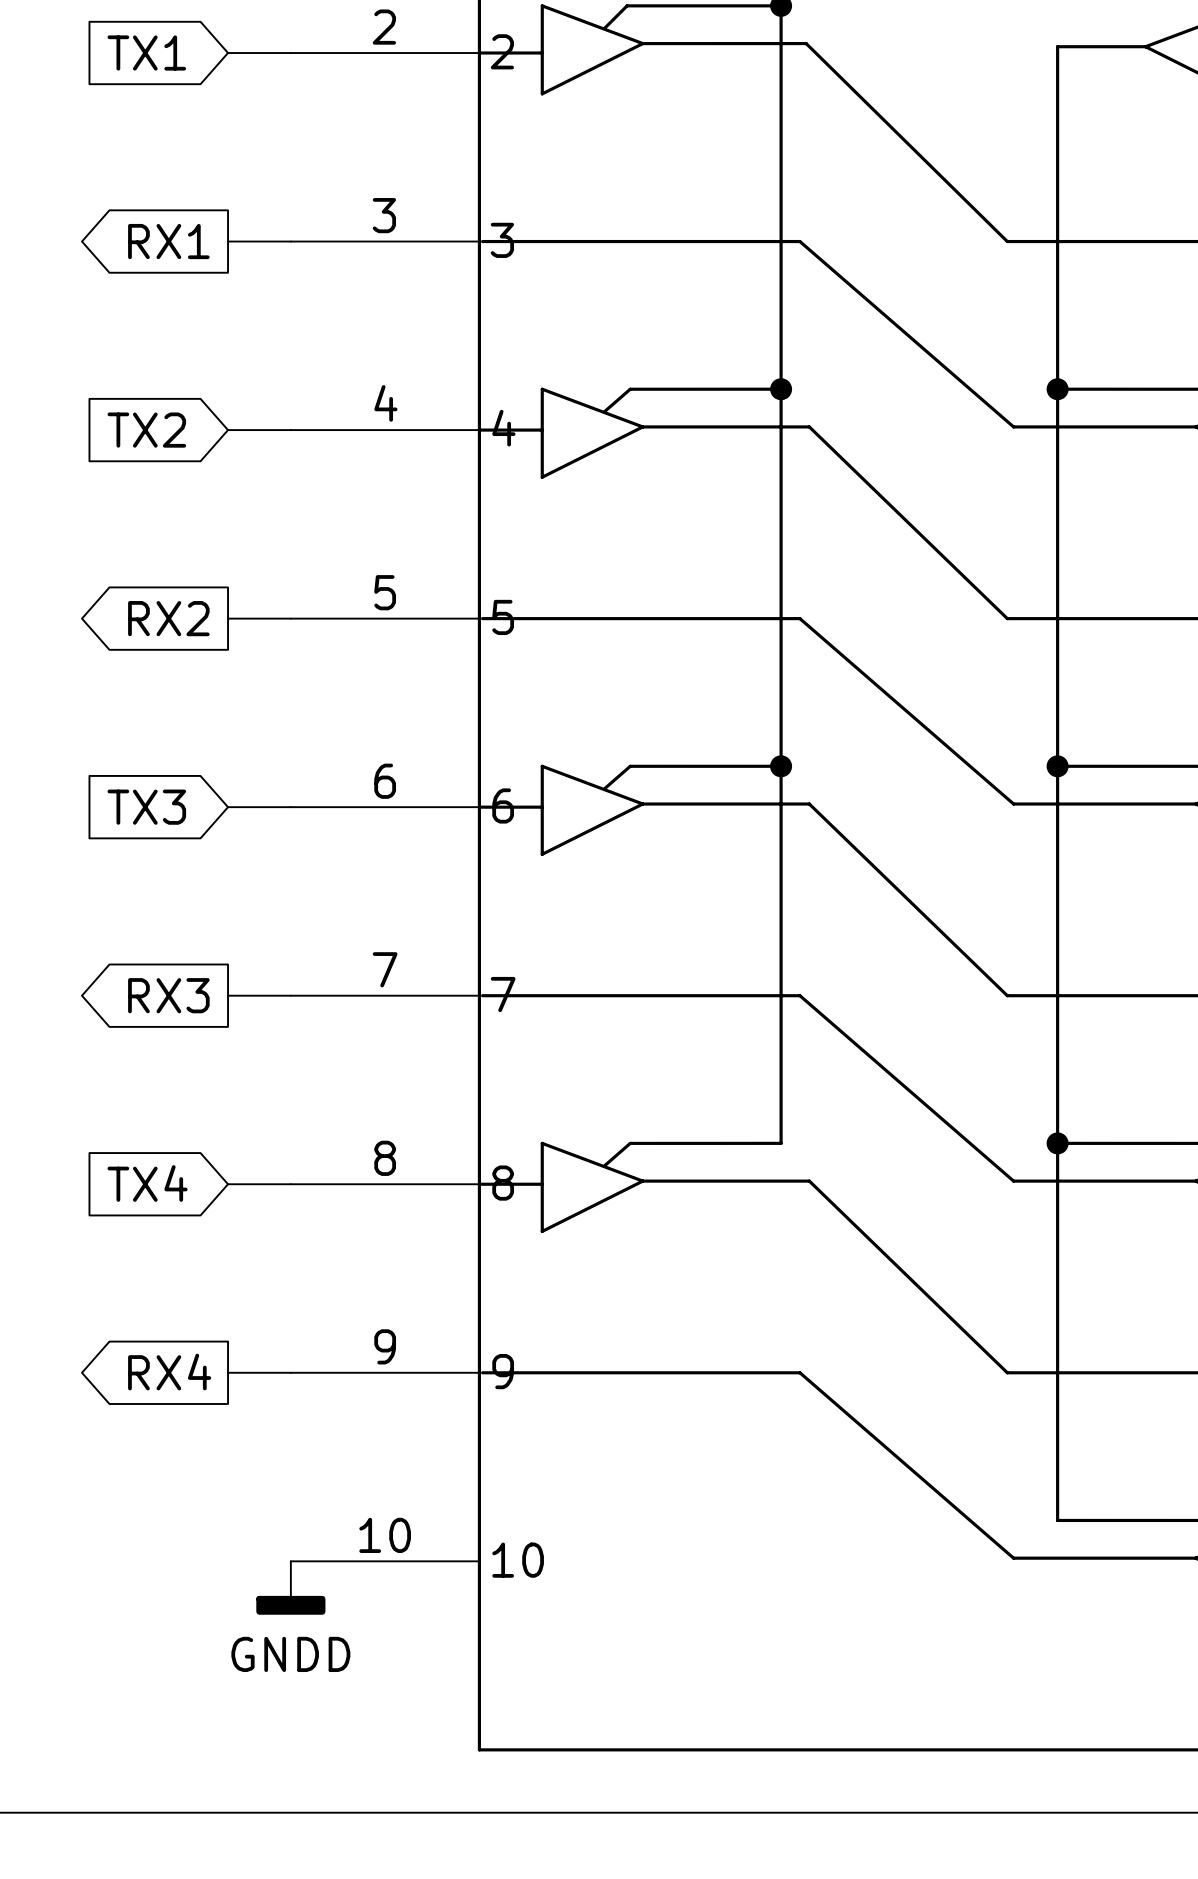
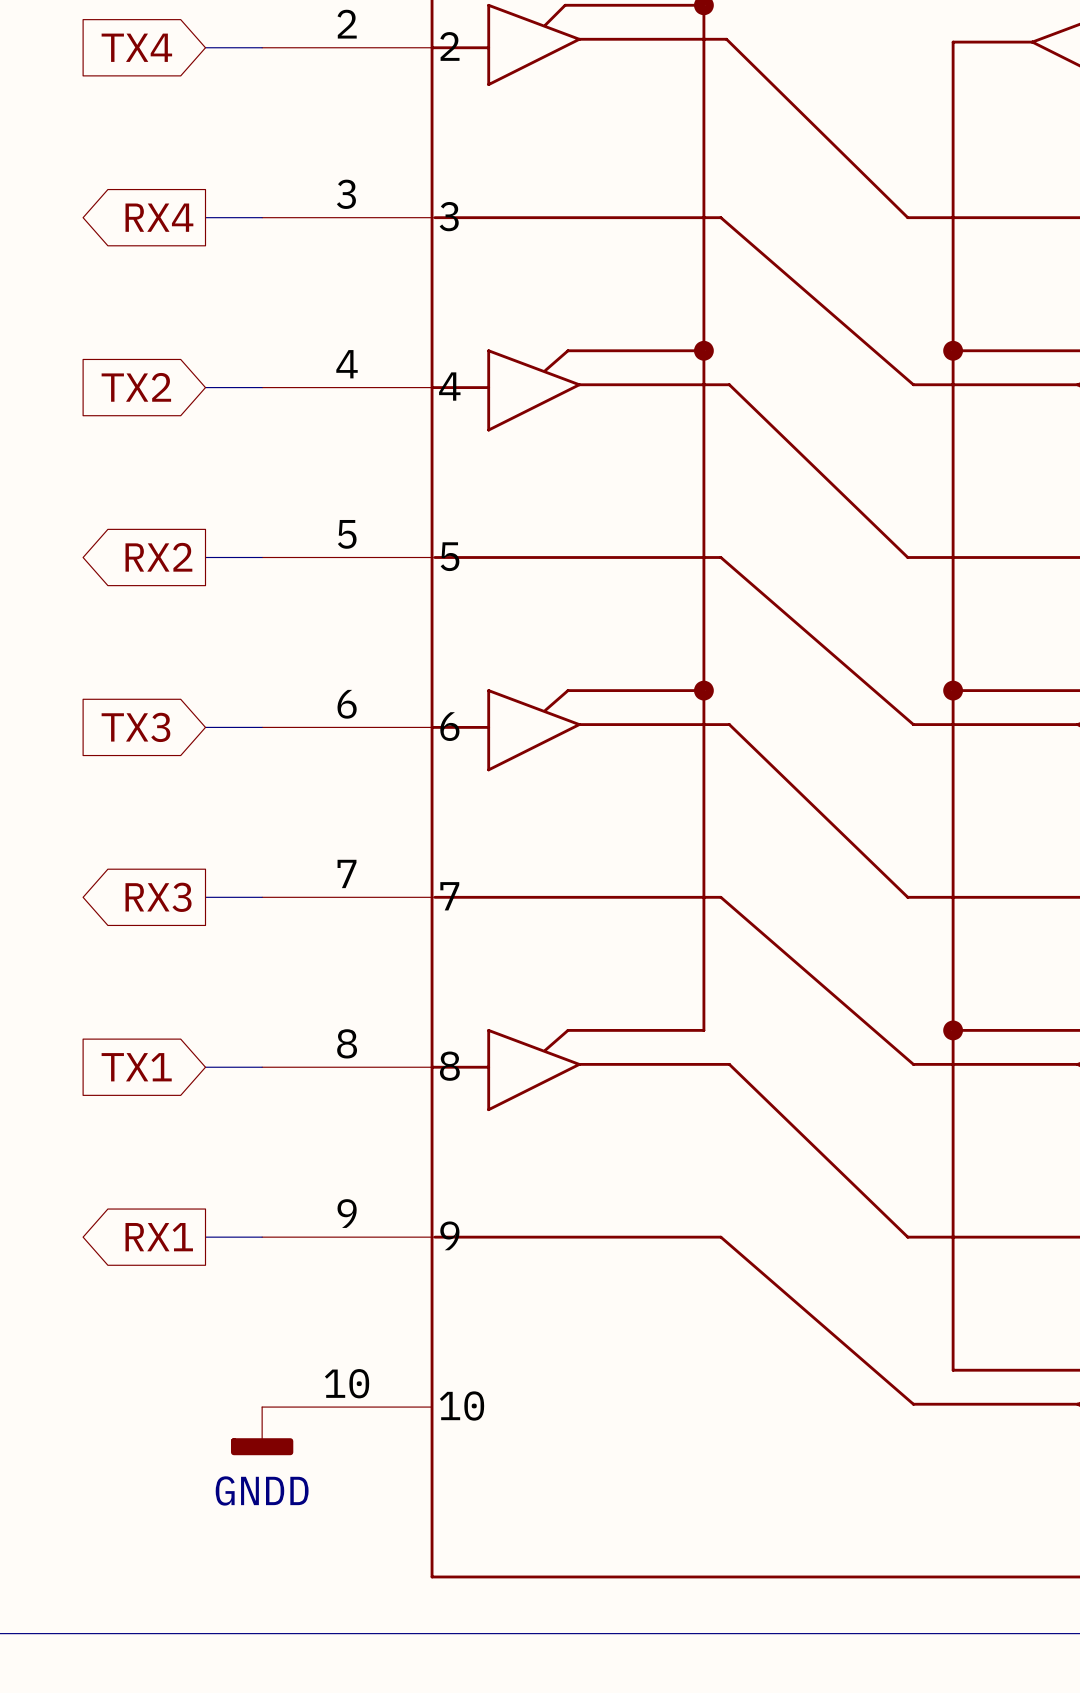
global label: TX1 (146, 52) -> TX4 (136, 47)
global label: RX1 (168, 241) -> RX4 (159, 217)
global label: TX4 (147, 1183) -> TX1 (136, 1067)
global label: RX4 (169, 1372) -> RX1 (159, 1237)

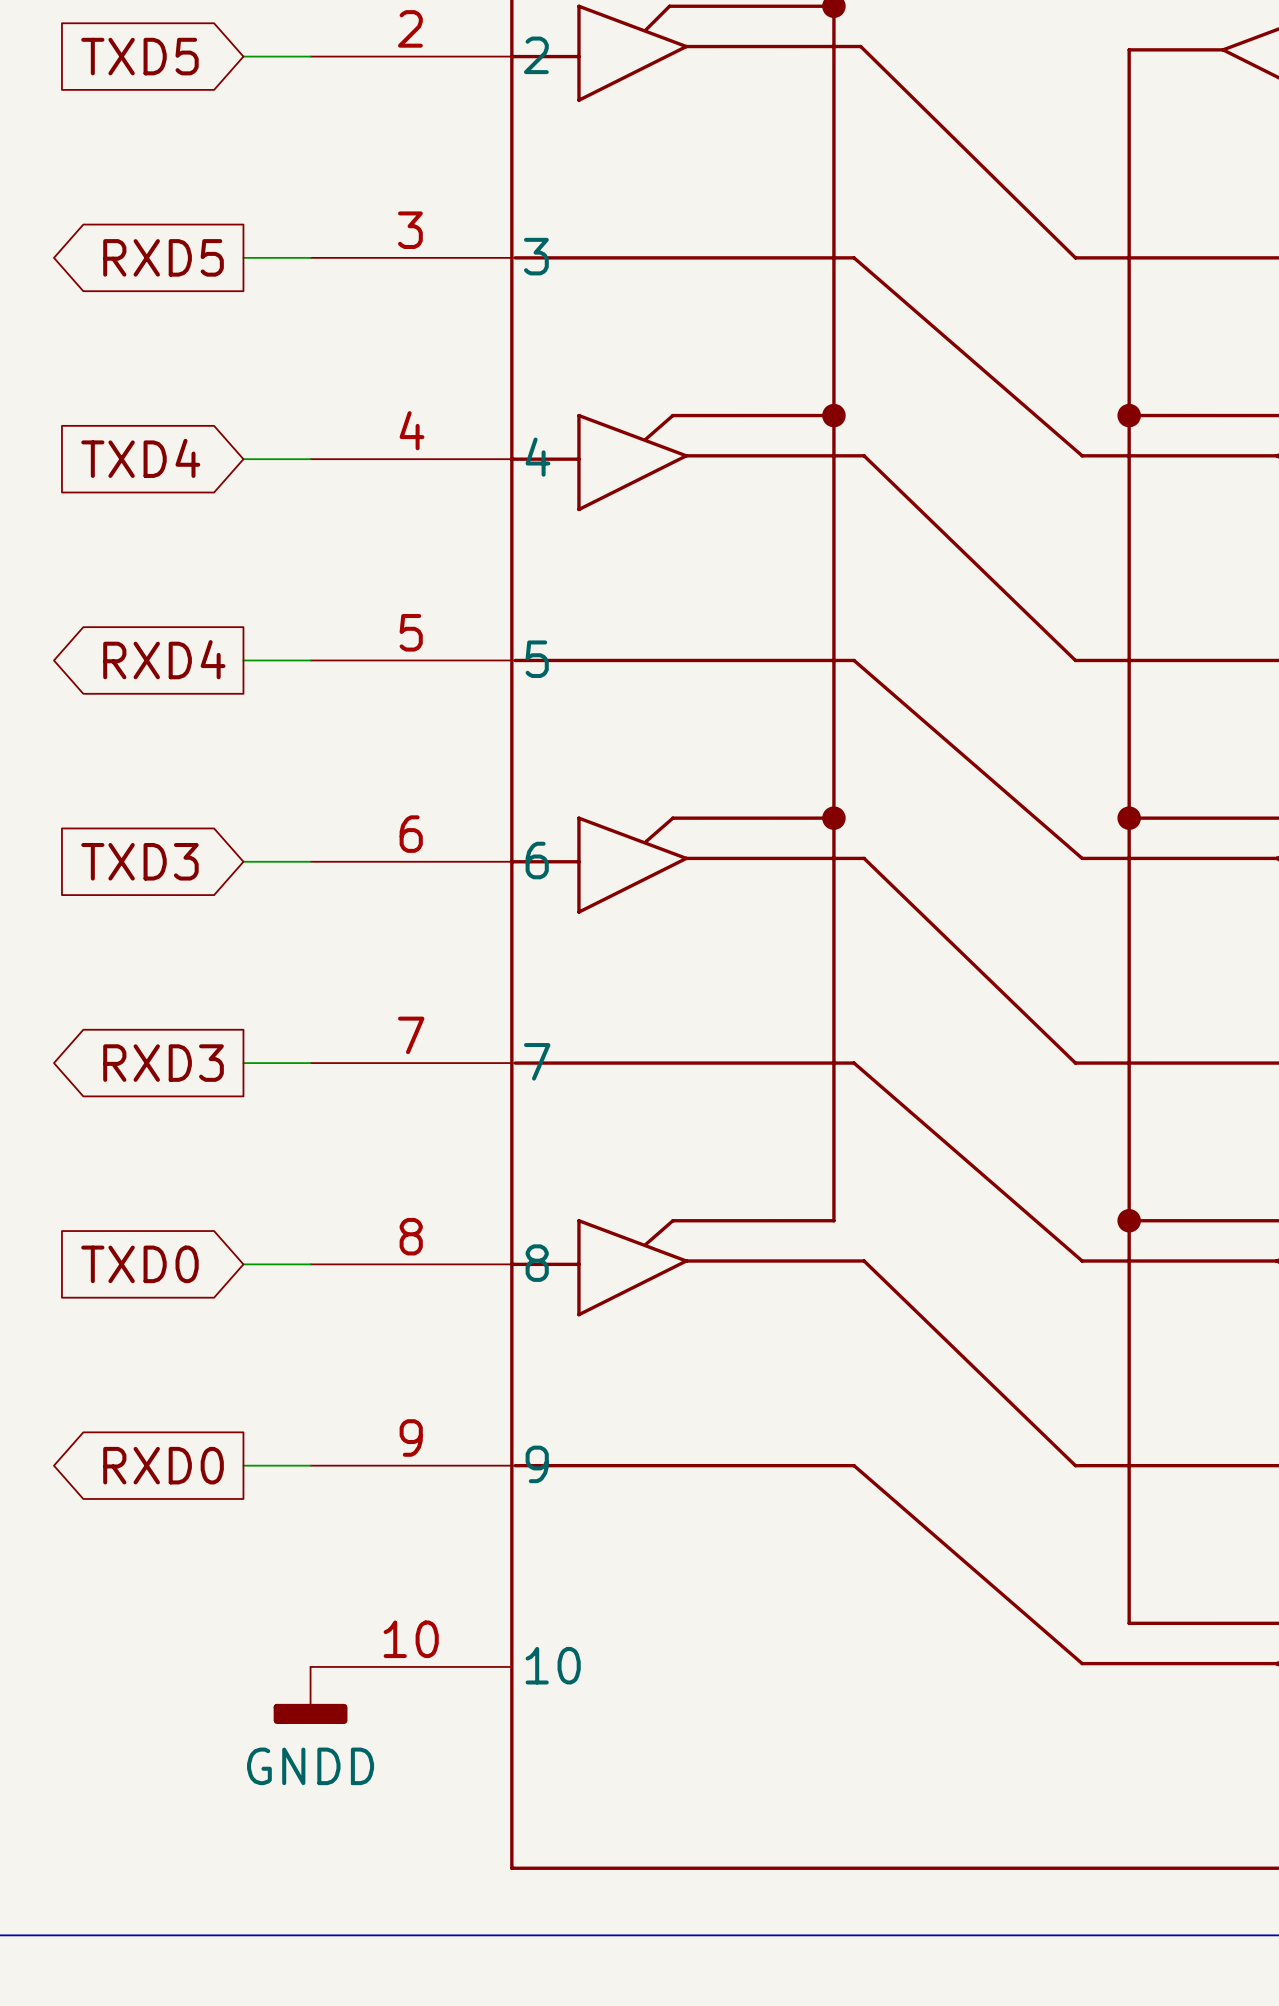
global label: TX4 (136, 47) -> TXD5 (139, 56)
global label: RX4 (159, 217) -> RXD5 (163, 257)
global label: TX2 (136, 387) -> TXD4 (140, 458)
global label: RX2 (158, 557) -> RXD4 (164, 659)
global label: TX3 (135, 727) -> TXD3 (139, 861)
global label: RX3 (158, 897) -> RXD3 (163, 1063)
global label: TX1 (136, 1067) -> TXD0 (139, 1264)
global label: RX1 (159, 1237) -> RXD0 (163, 1465)

